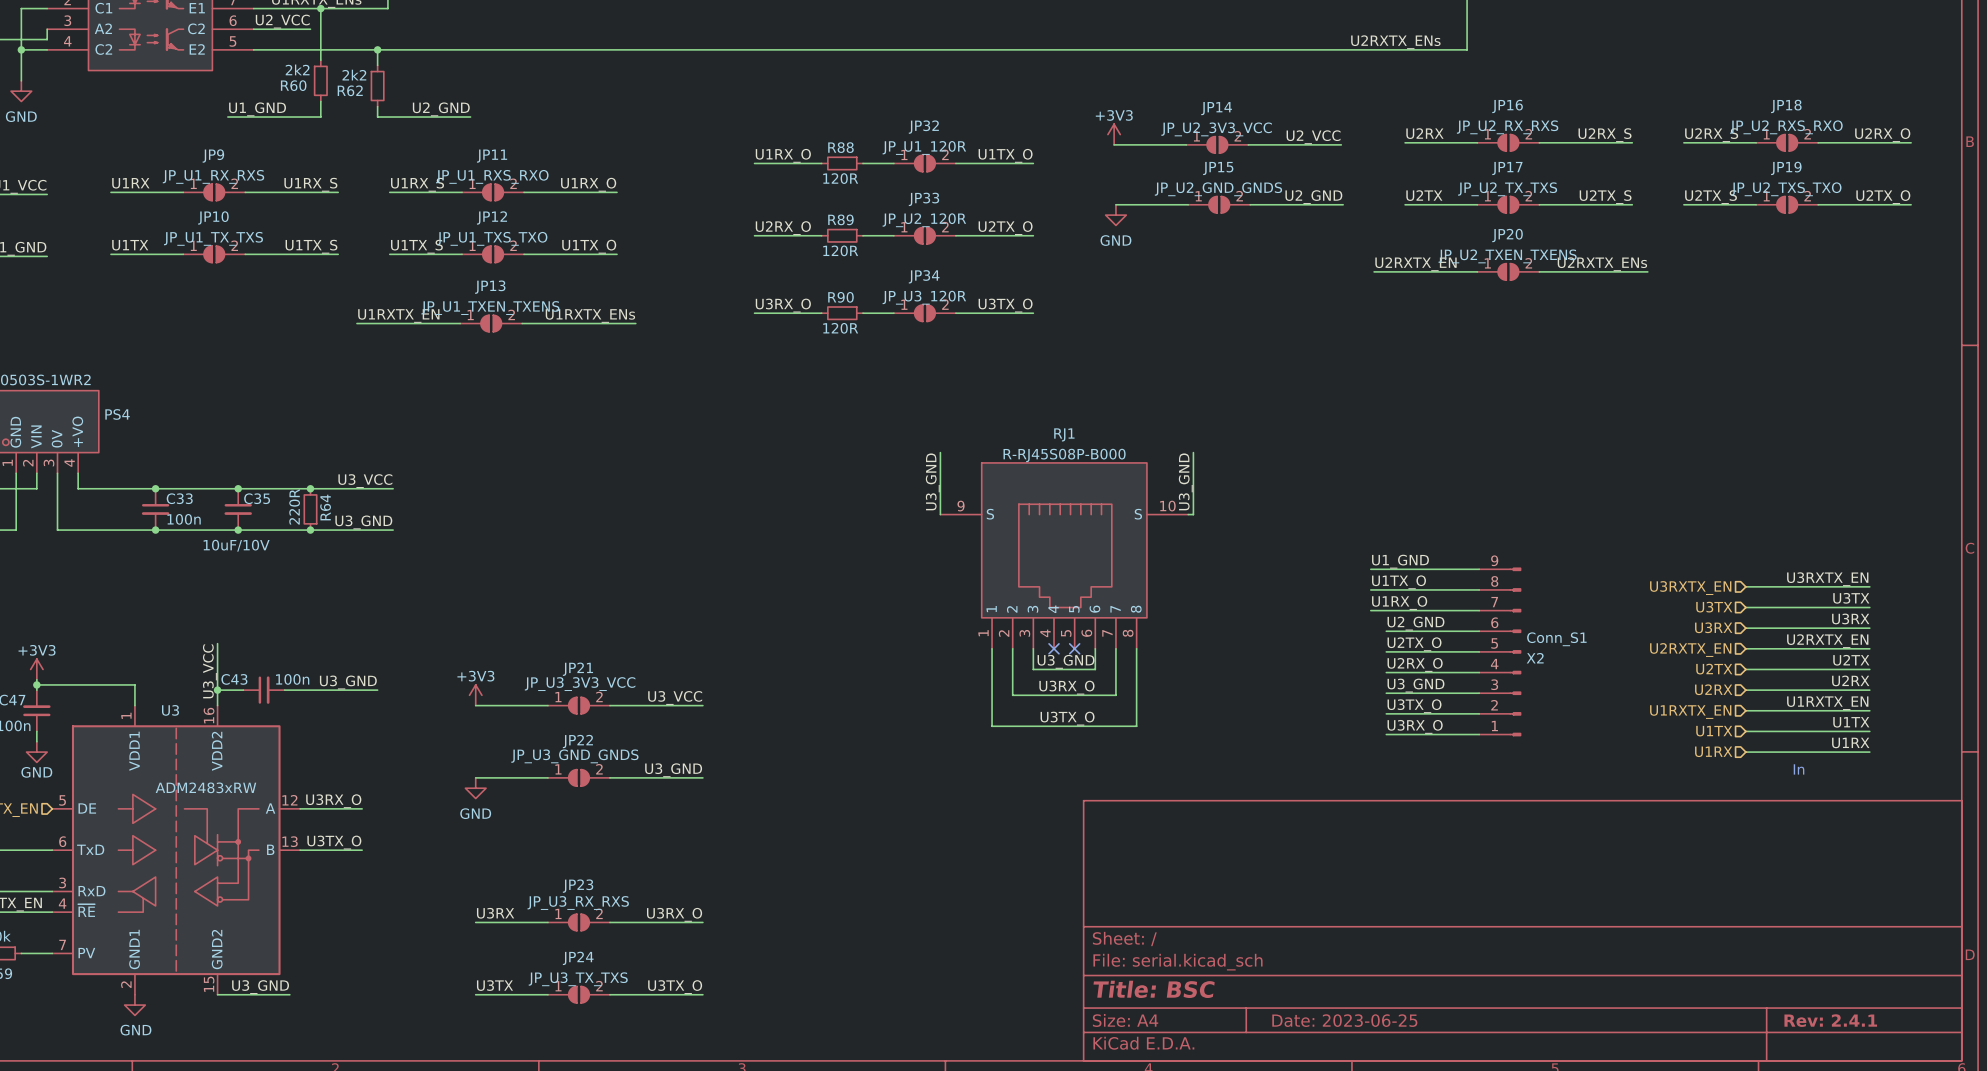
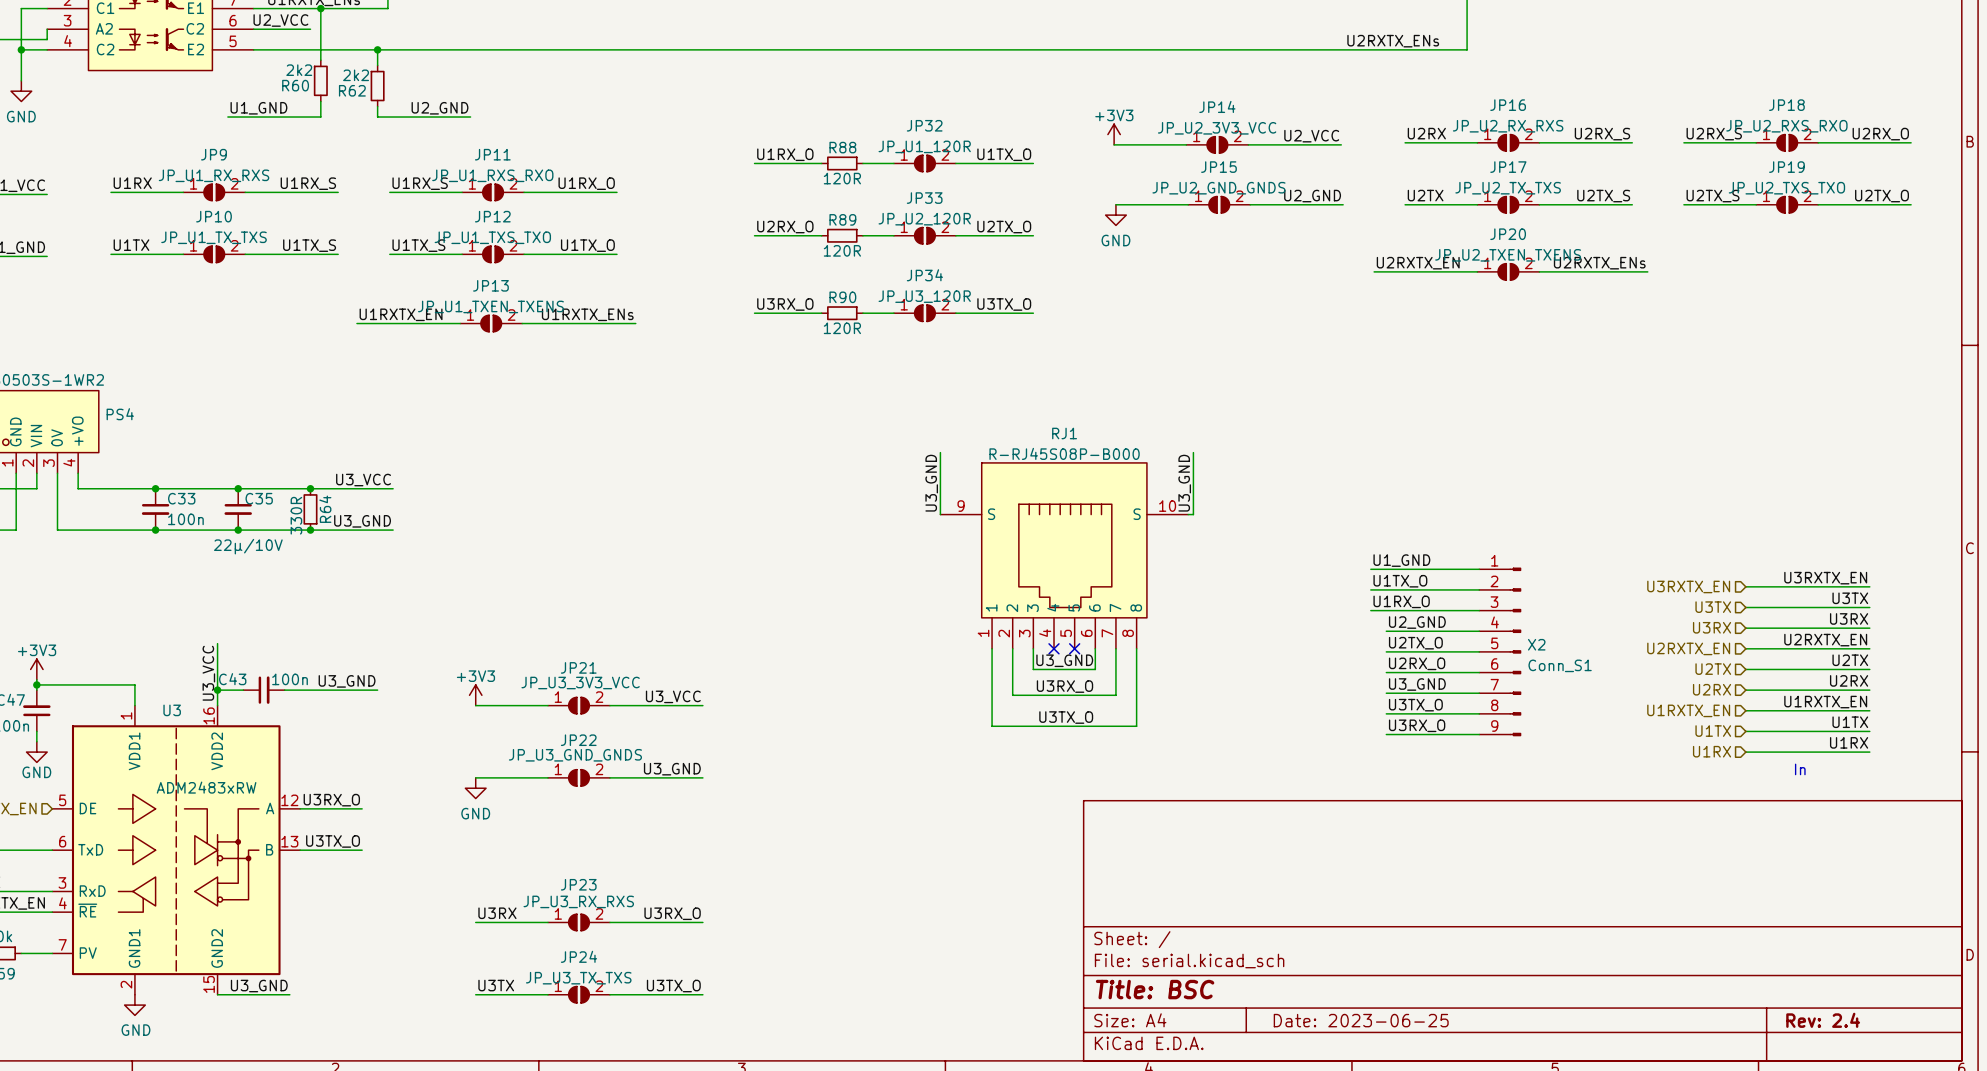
R64 value: 220R (294, 506) -> 330R (296, 515)
C35 value: 10uF/10V (236, 545) -> 22µ/10V (248, 546)
X2 flip: as is (1515, 651) -> up-down (1515, 651)
title block: Rev: 2.4.1 (1830, 1020) -> Rev: 2.4 (1823, 1020)

